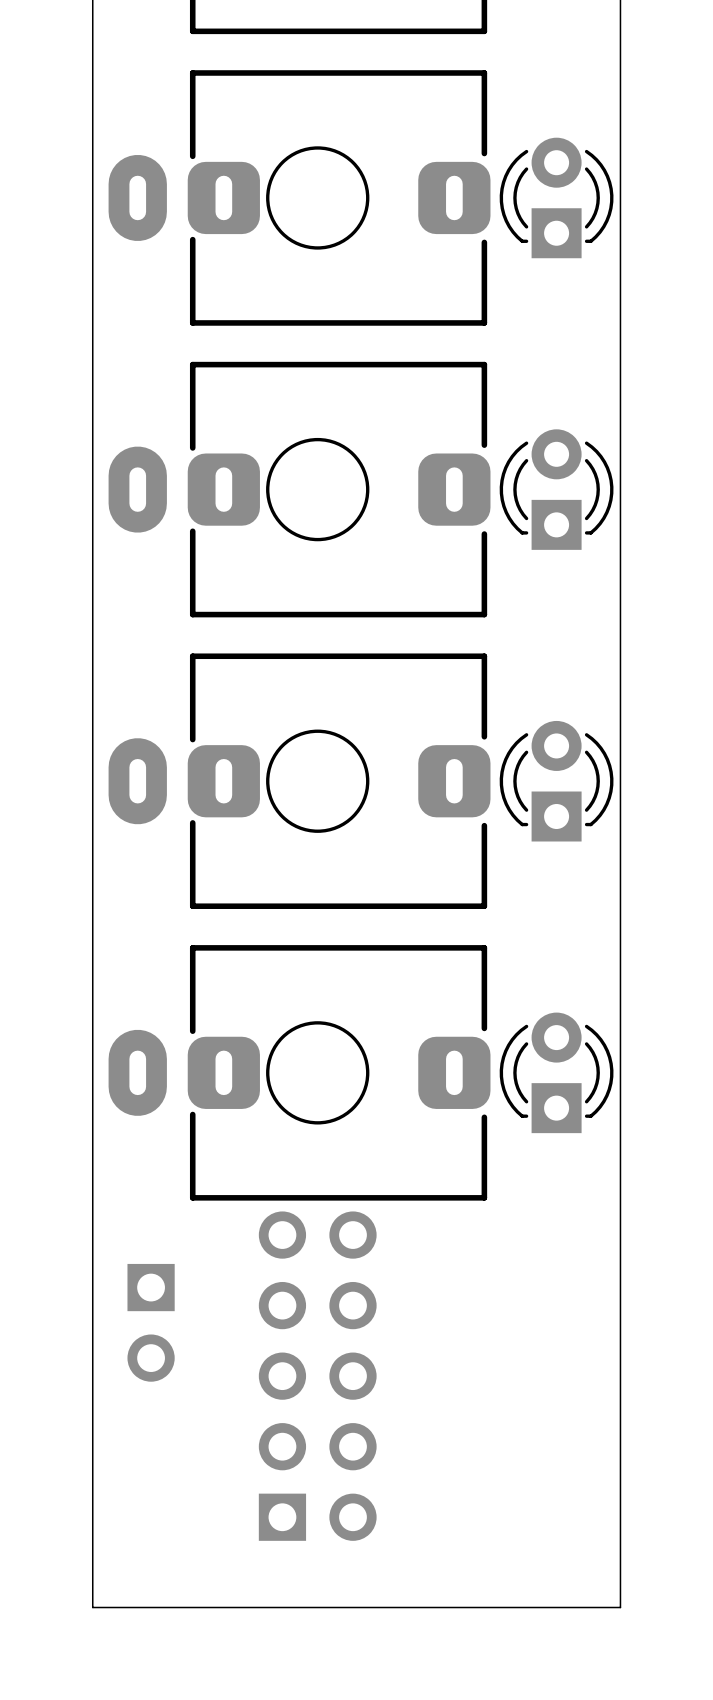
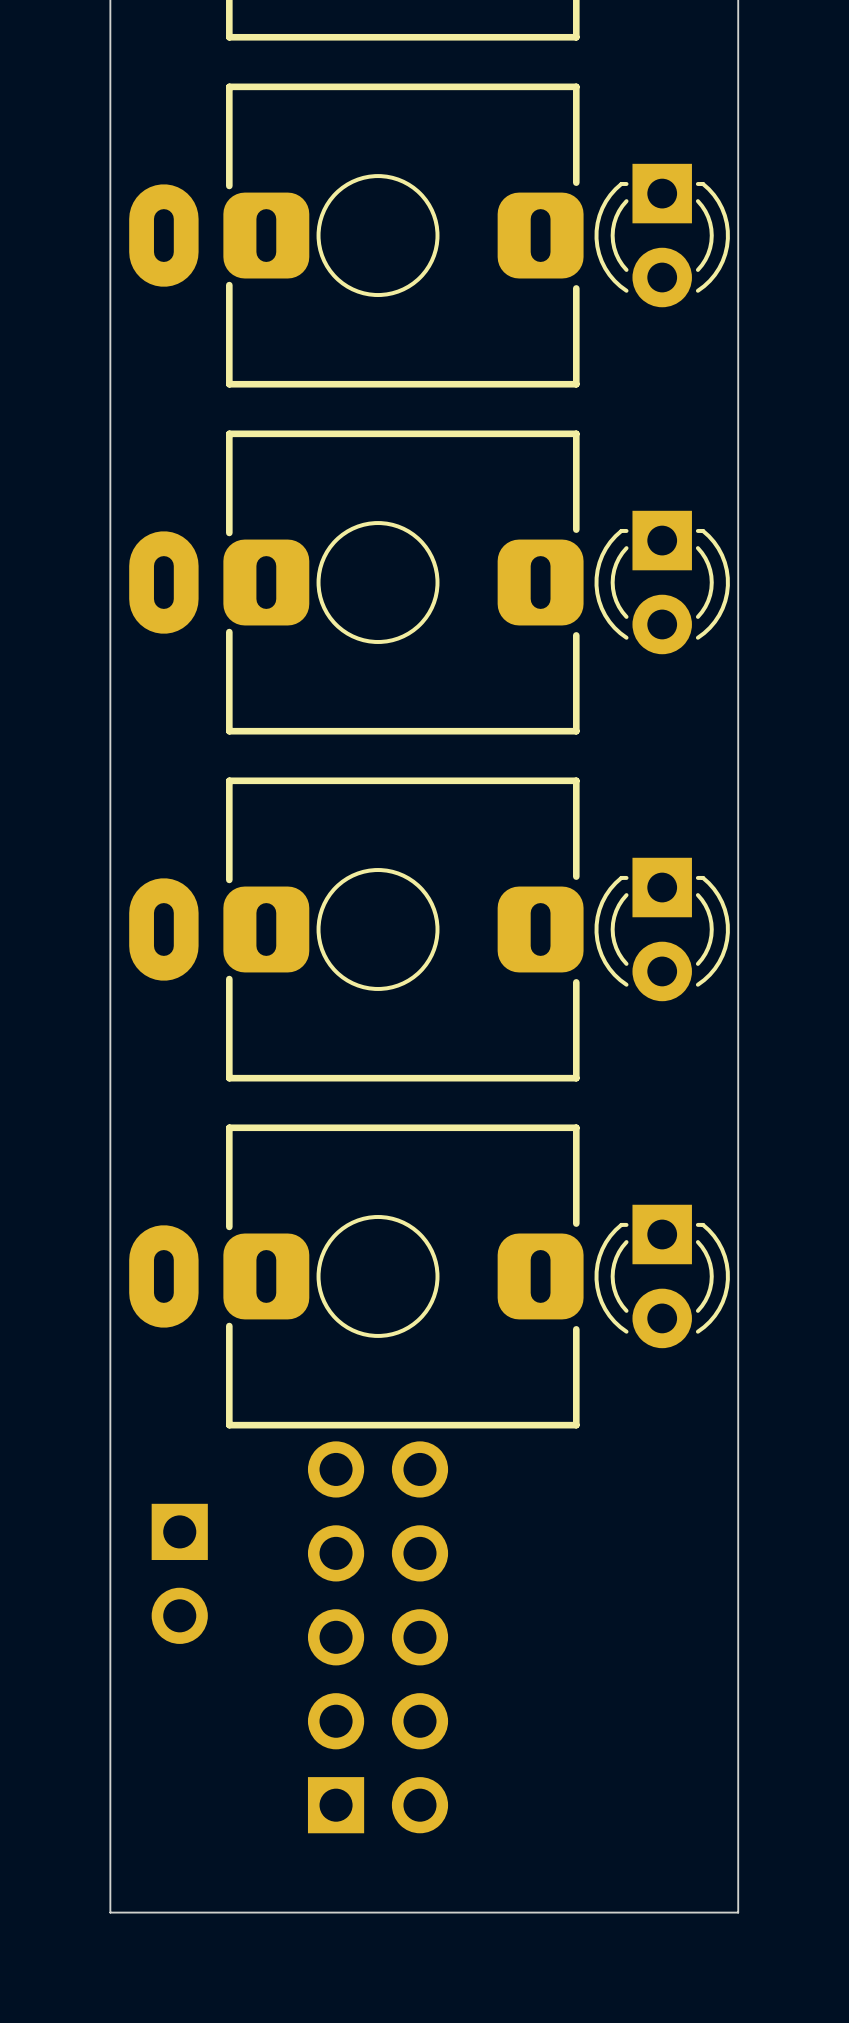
part rotation: 0° (556, 197) -> 180° (662, 235)
part rotation: 0° (556, 489) -> 180° (662, 582)
part rotation: 0° (556, 781) -> 180° (662, 929)
part rotation: 0° (556, 1072) -> 180° (662, 1276)

